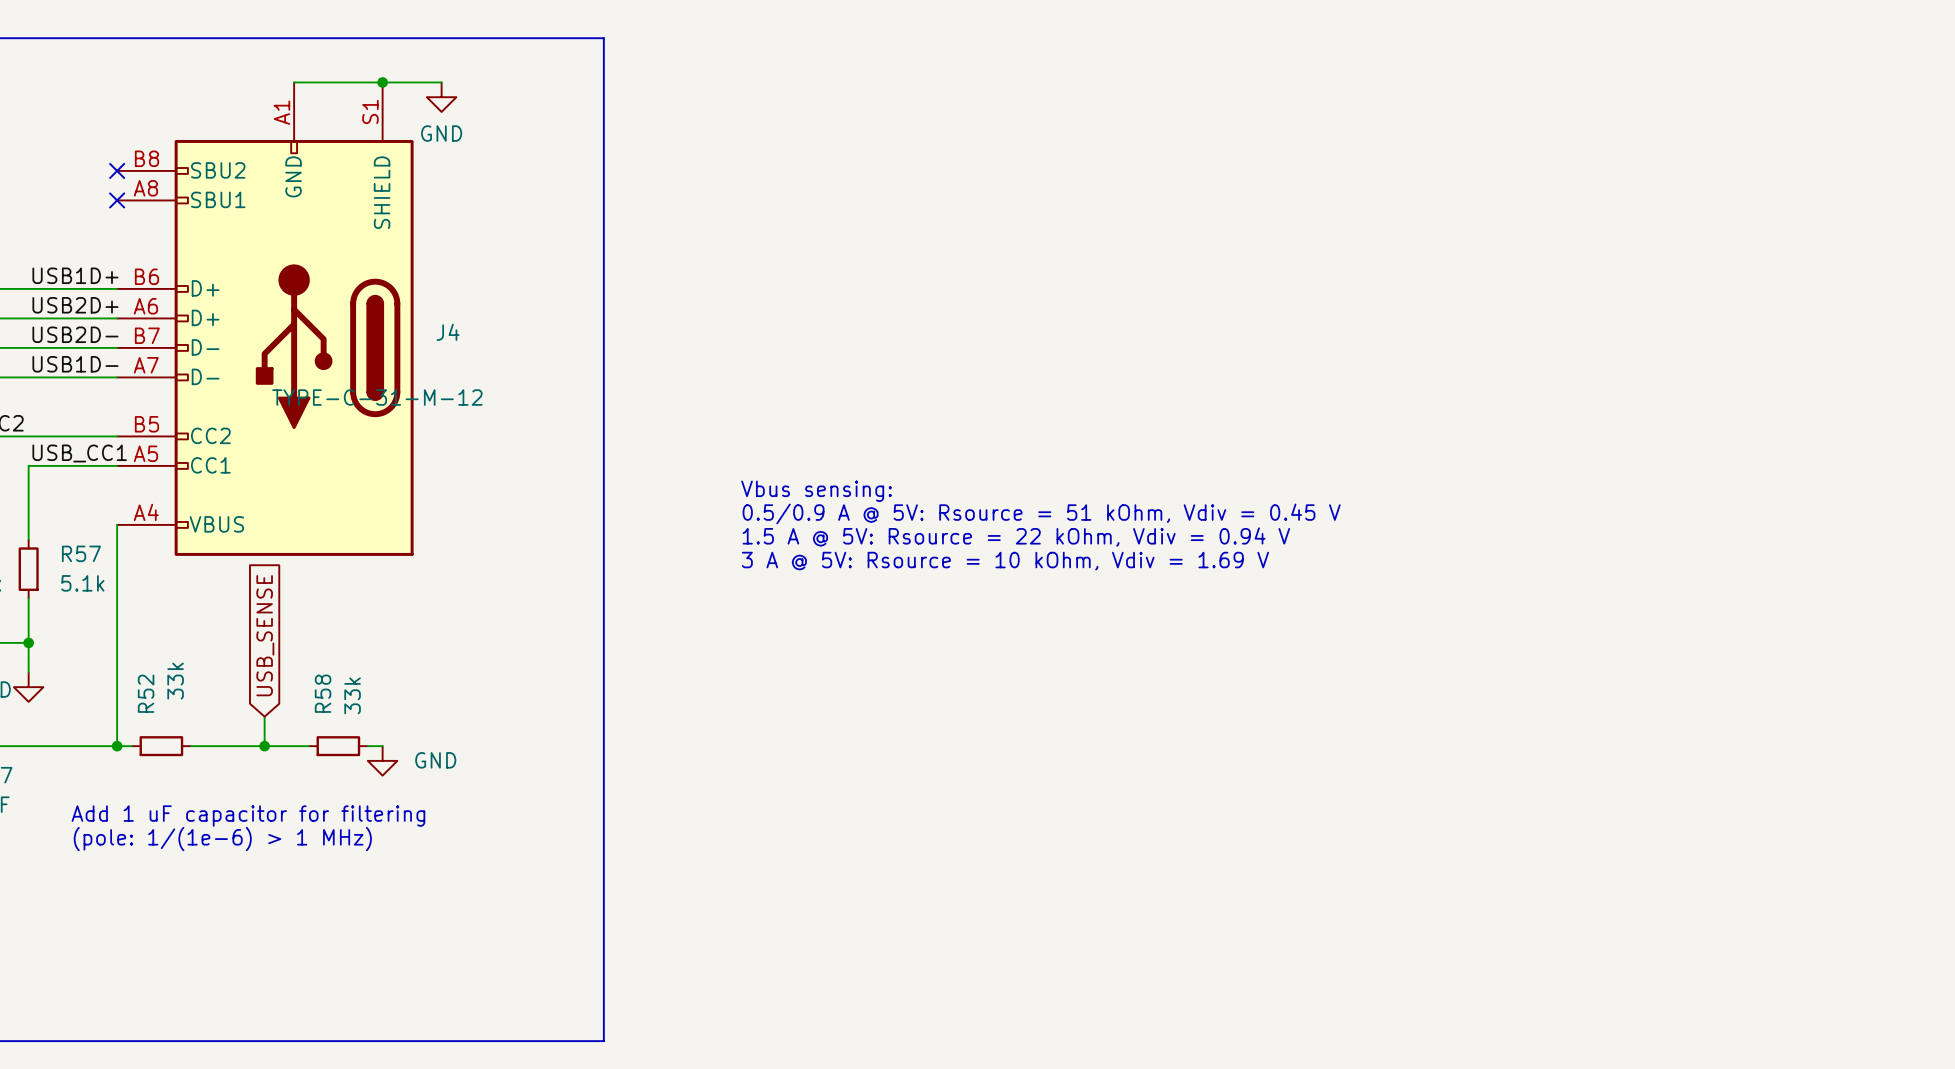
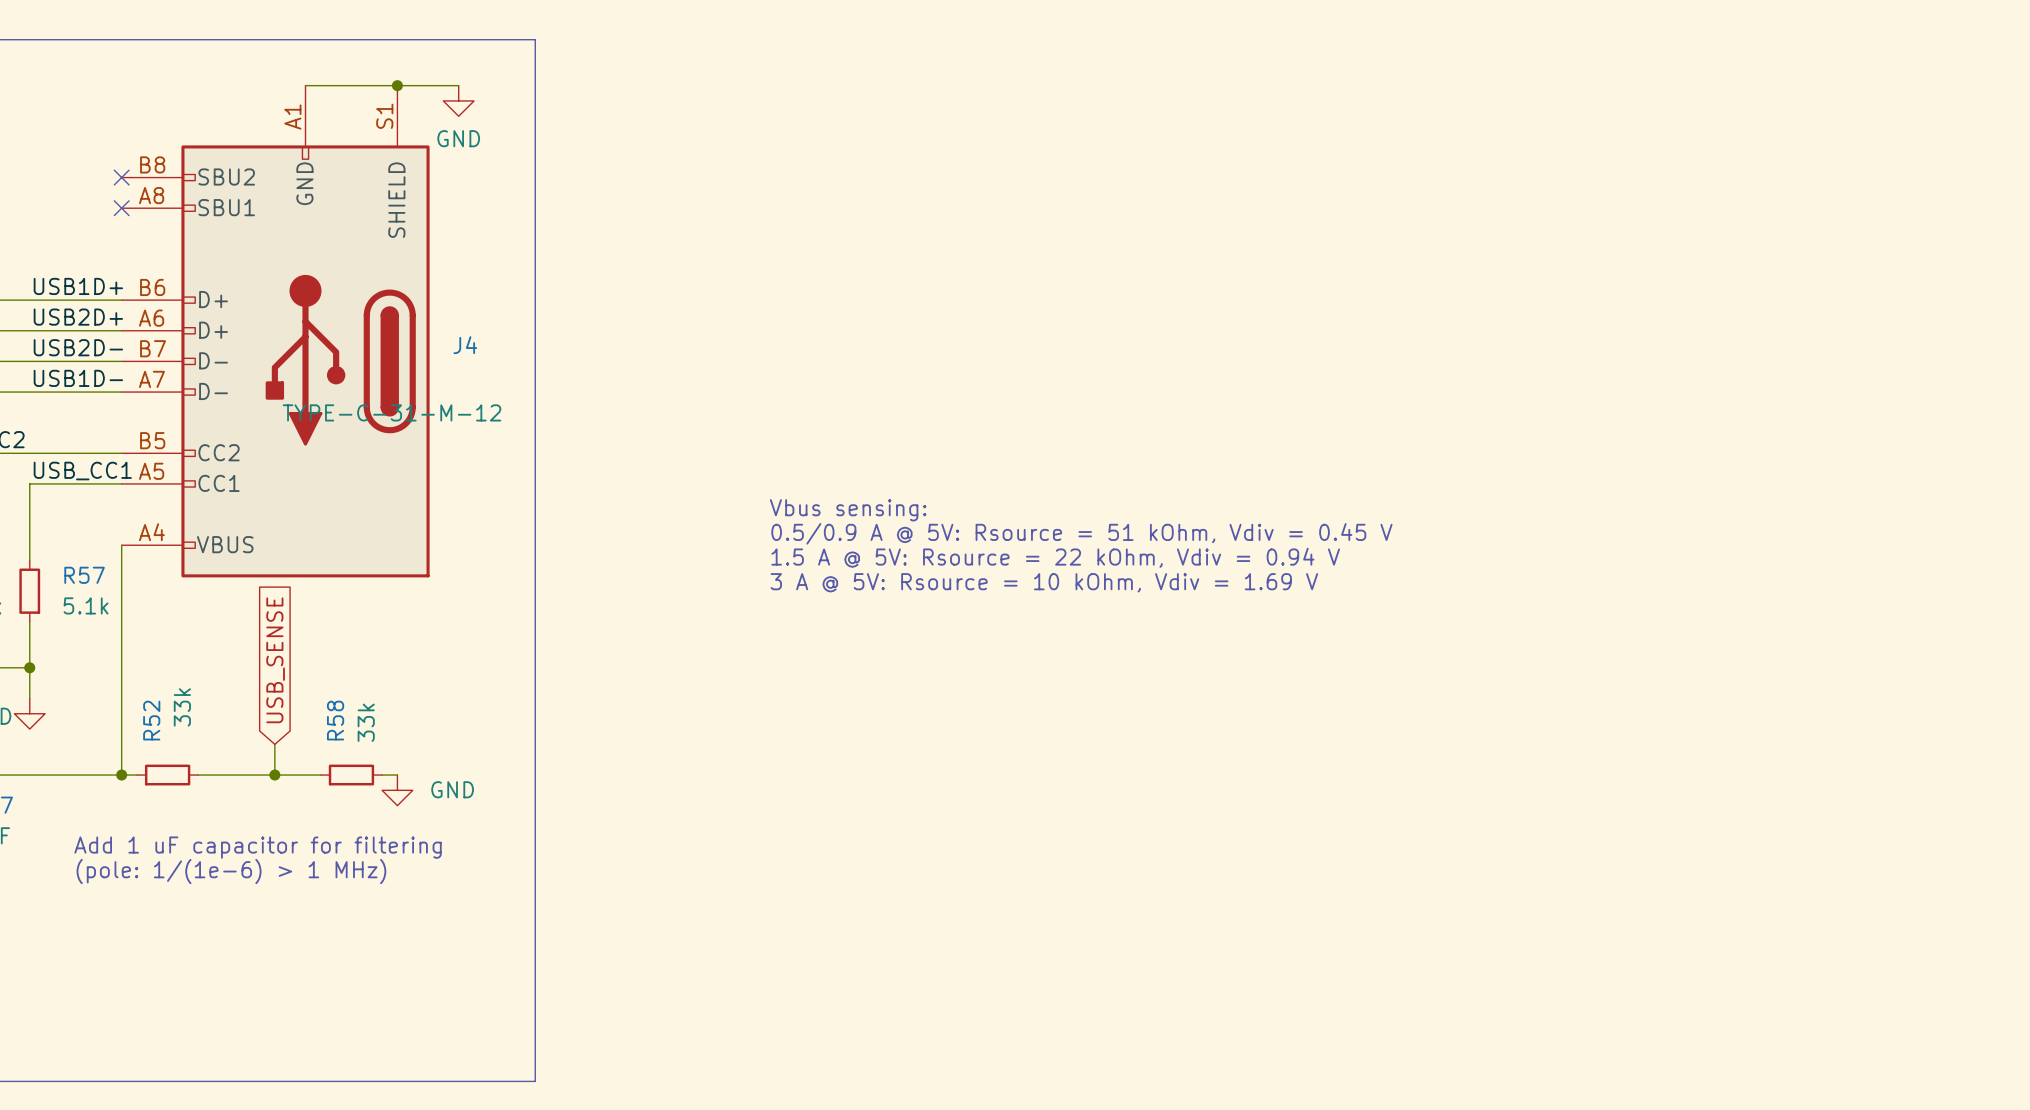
line: (515, 38) (603, 38) (603, 1041) (515, 1041) -> (535, 39) (535, 1081)

